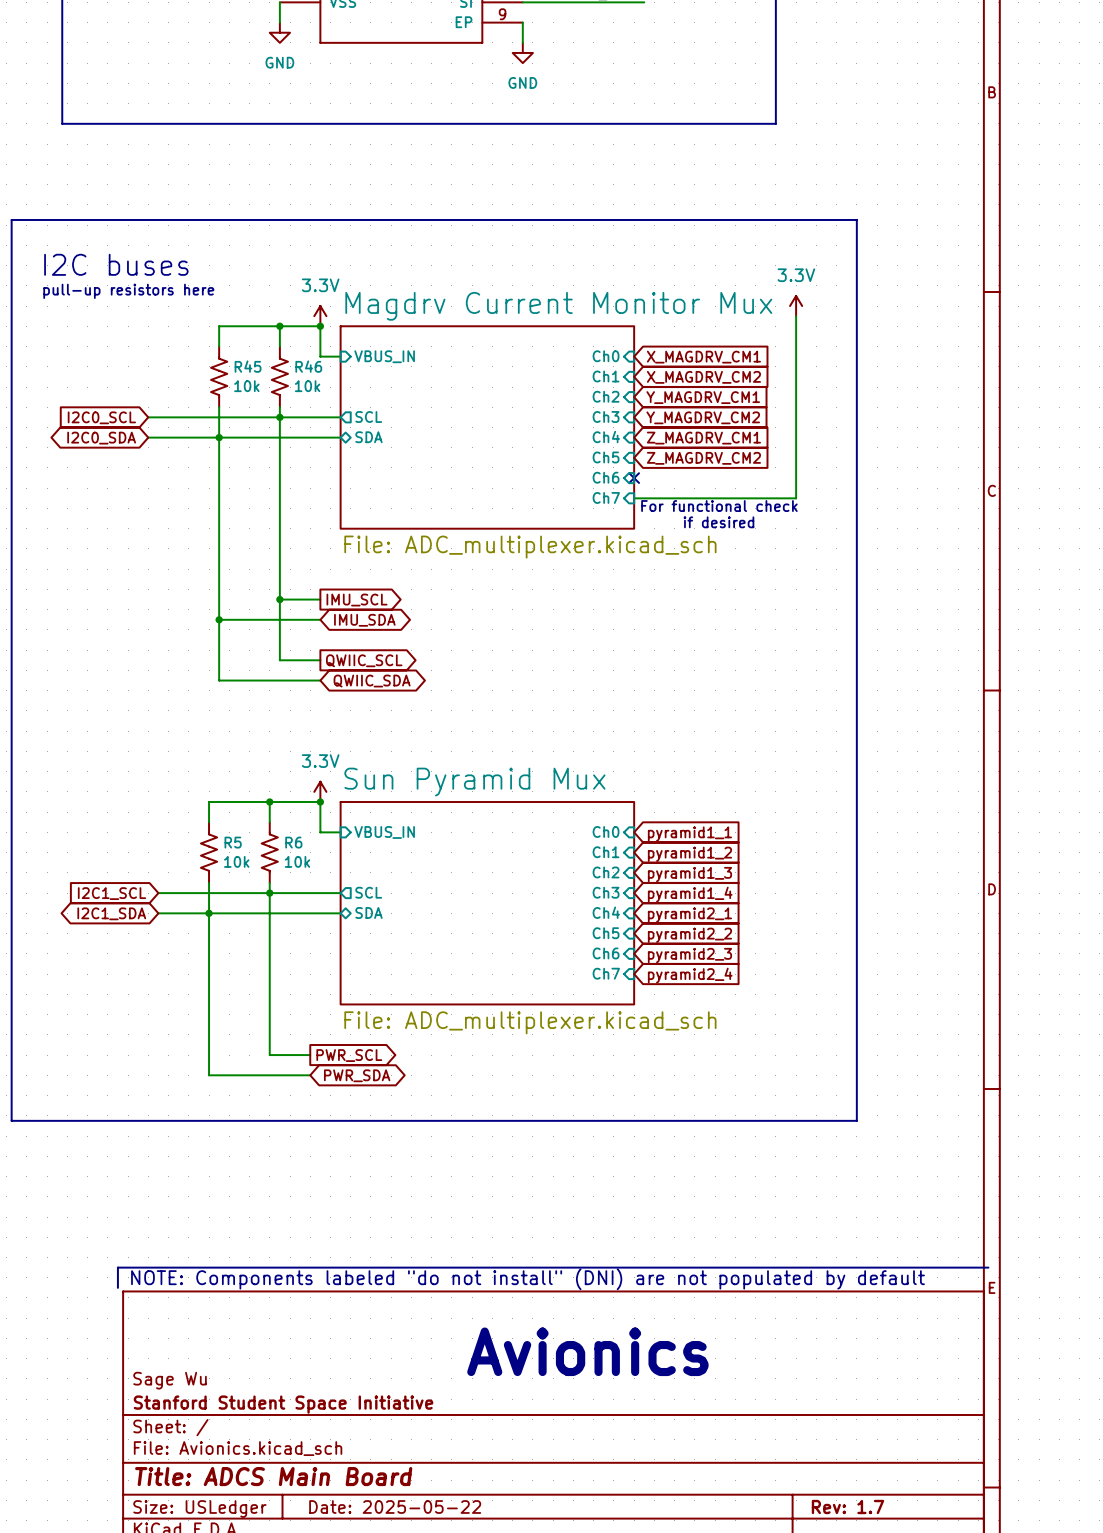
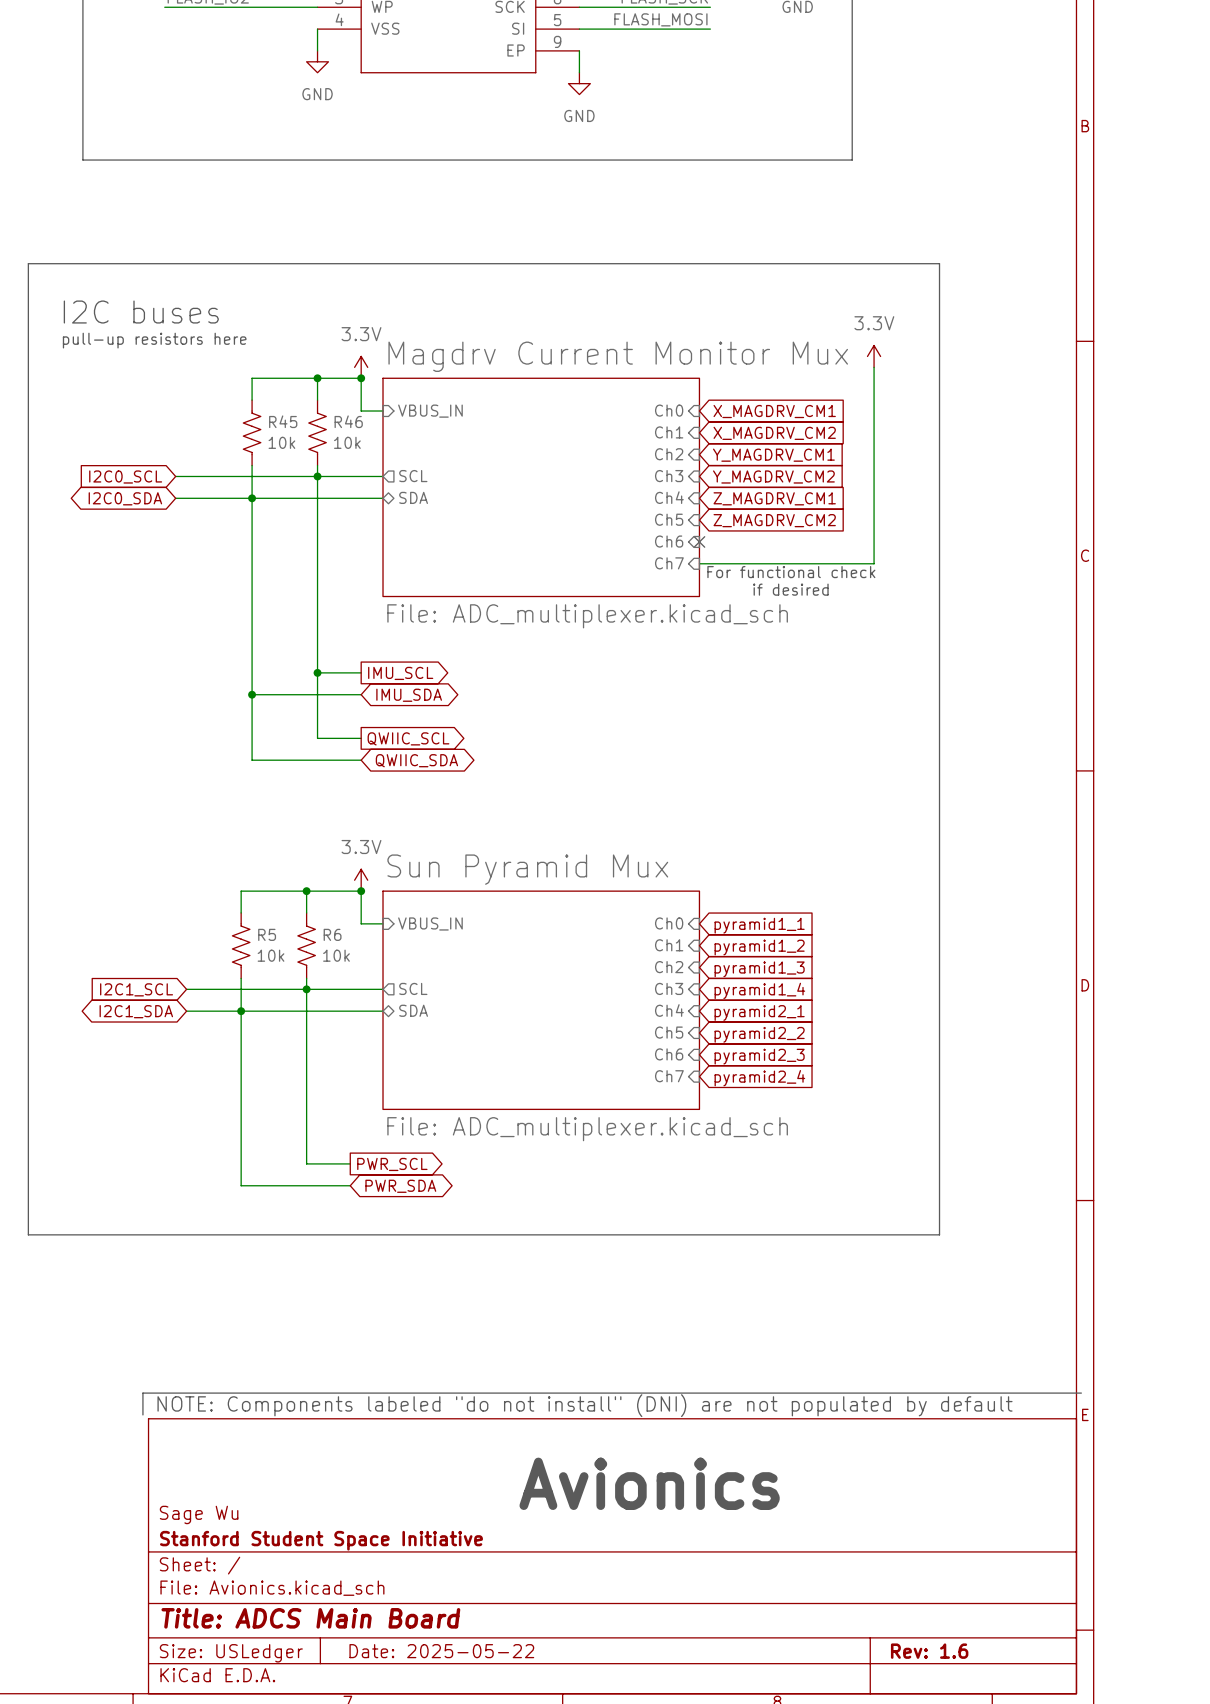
title block: Rev: 1.7 (847, 1507) -> Rev: 1.6 (929, 1651)

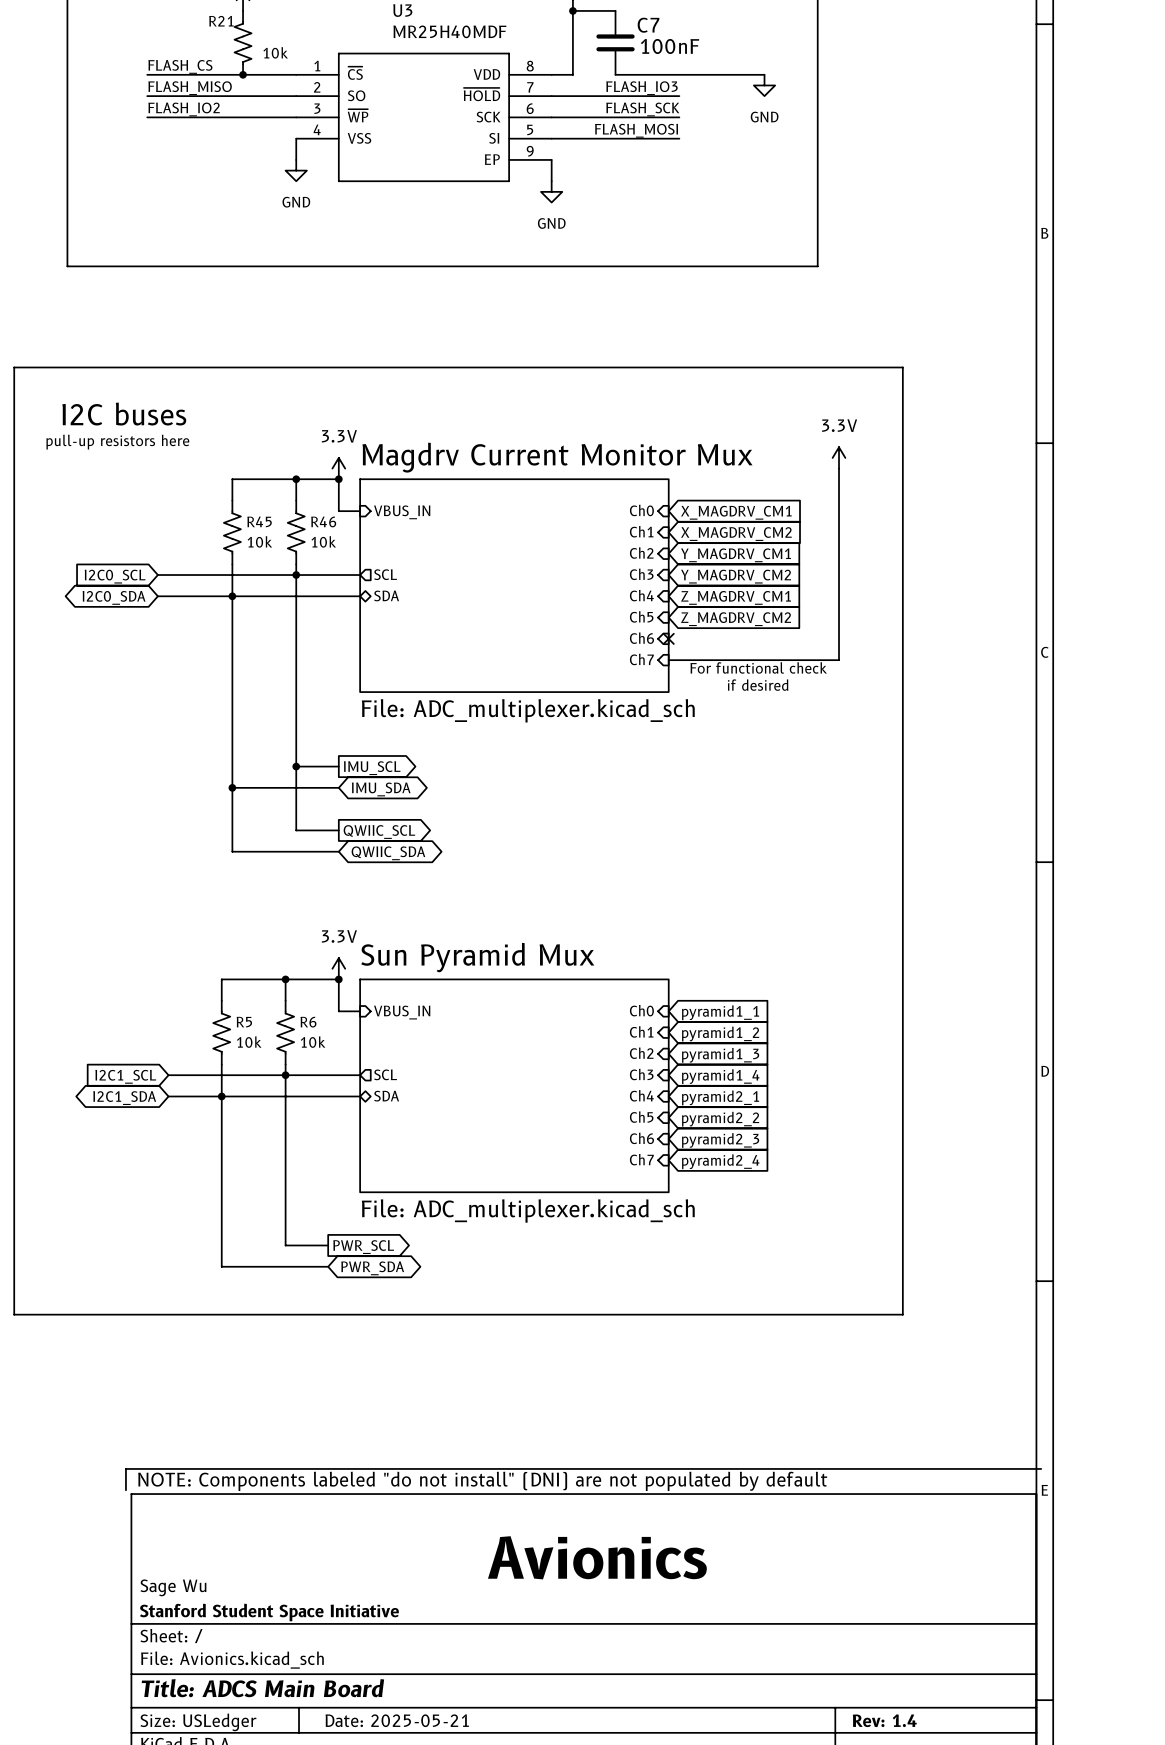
title block: Date: 2025-05-22 (441, 1651) -> Date: 2025-05-21 (397, 1720)
title block: Rev: 1.6 (929, 1651) -> Rev: 1.4 (884, 1720)

